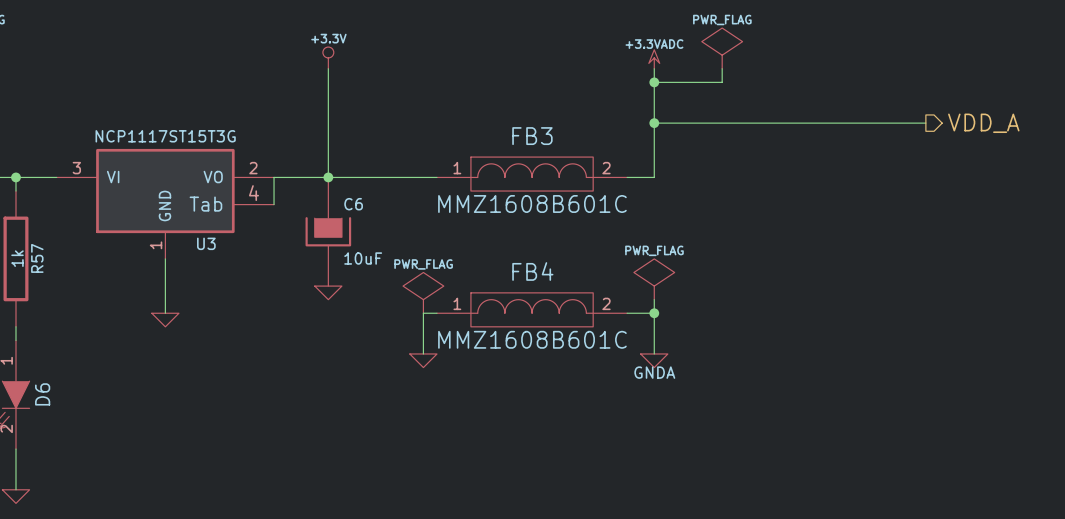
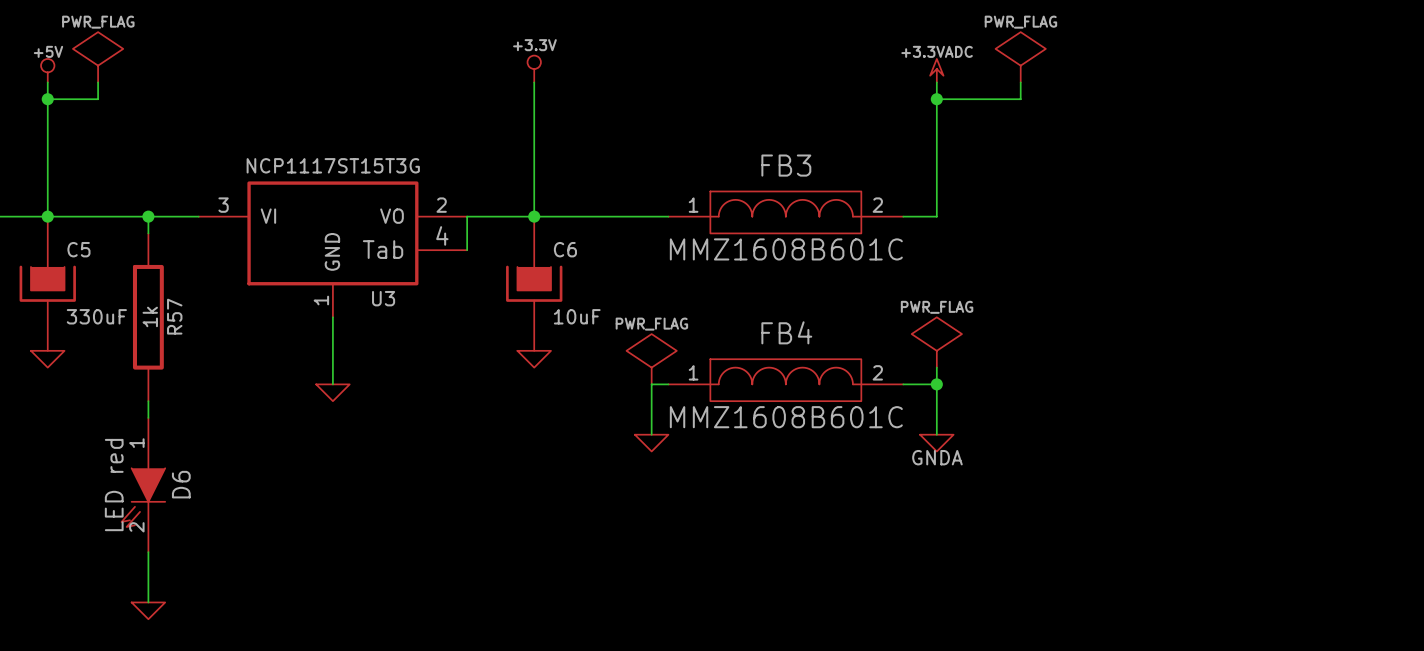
wire: (654, 123) (925, 123) -> none
junction: (654, 123) -> none
hierarchical label: VDD_A (983, 123) -> none

